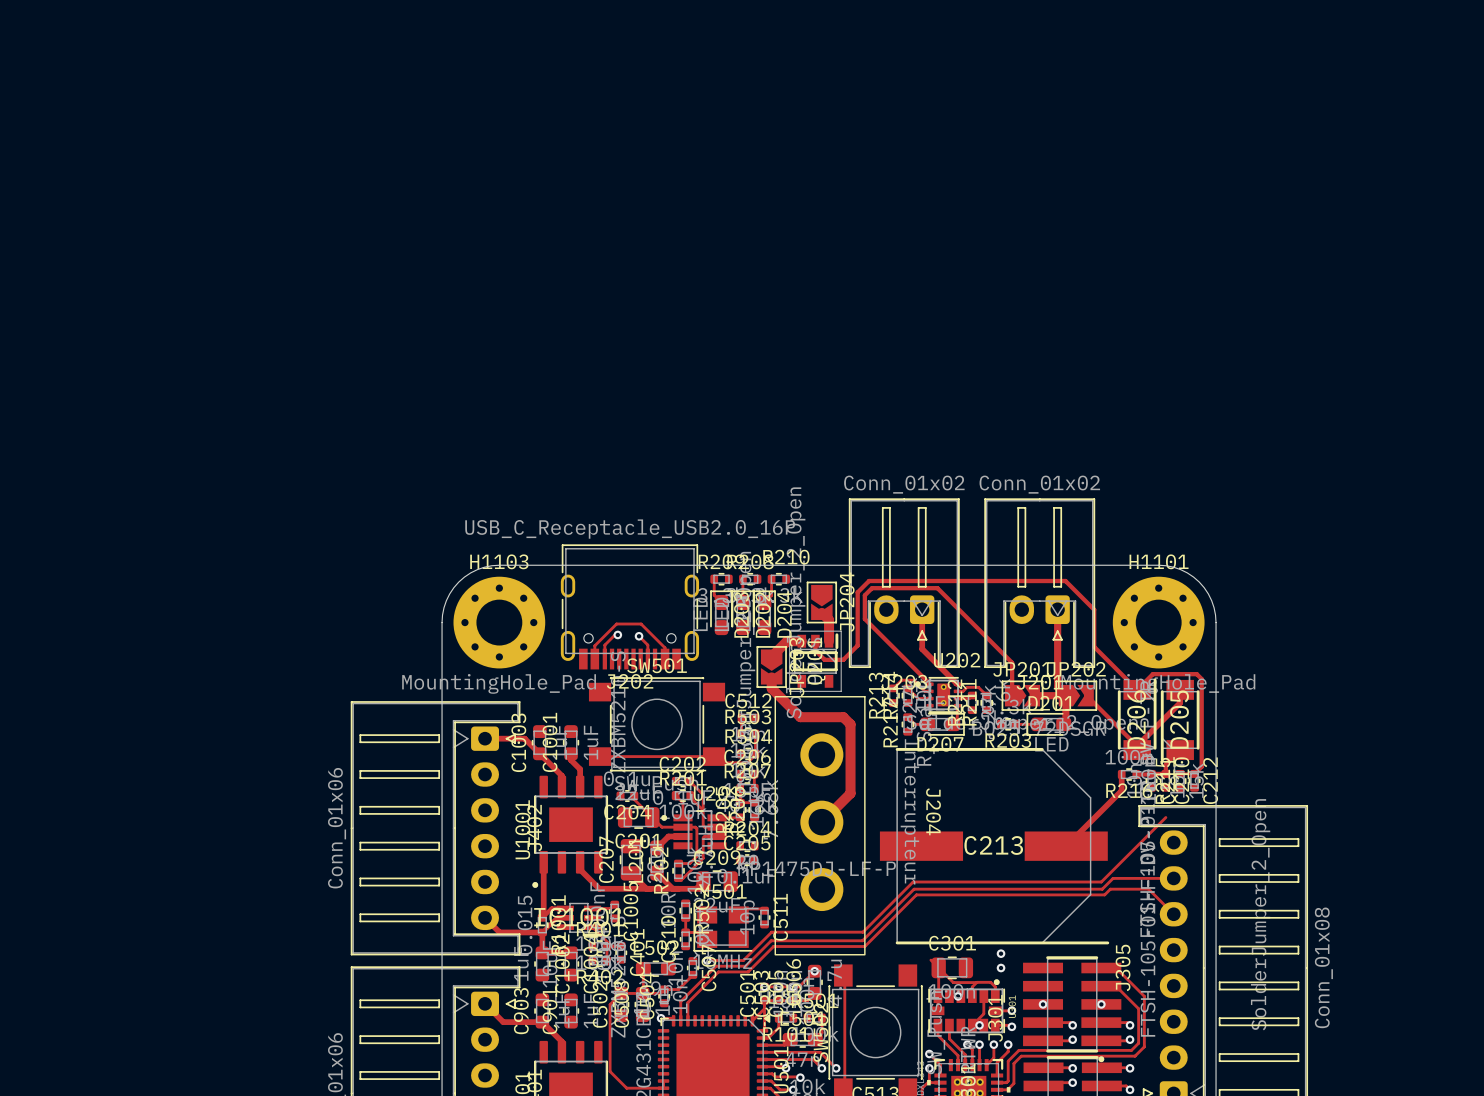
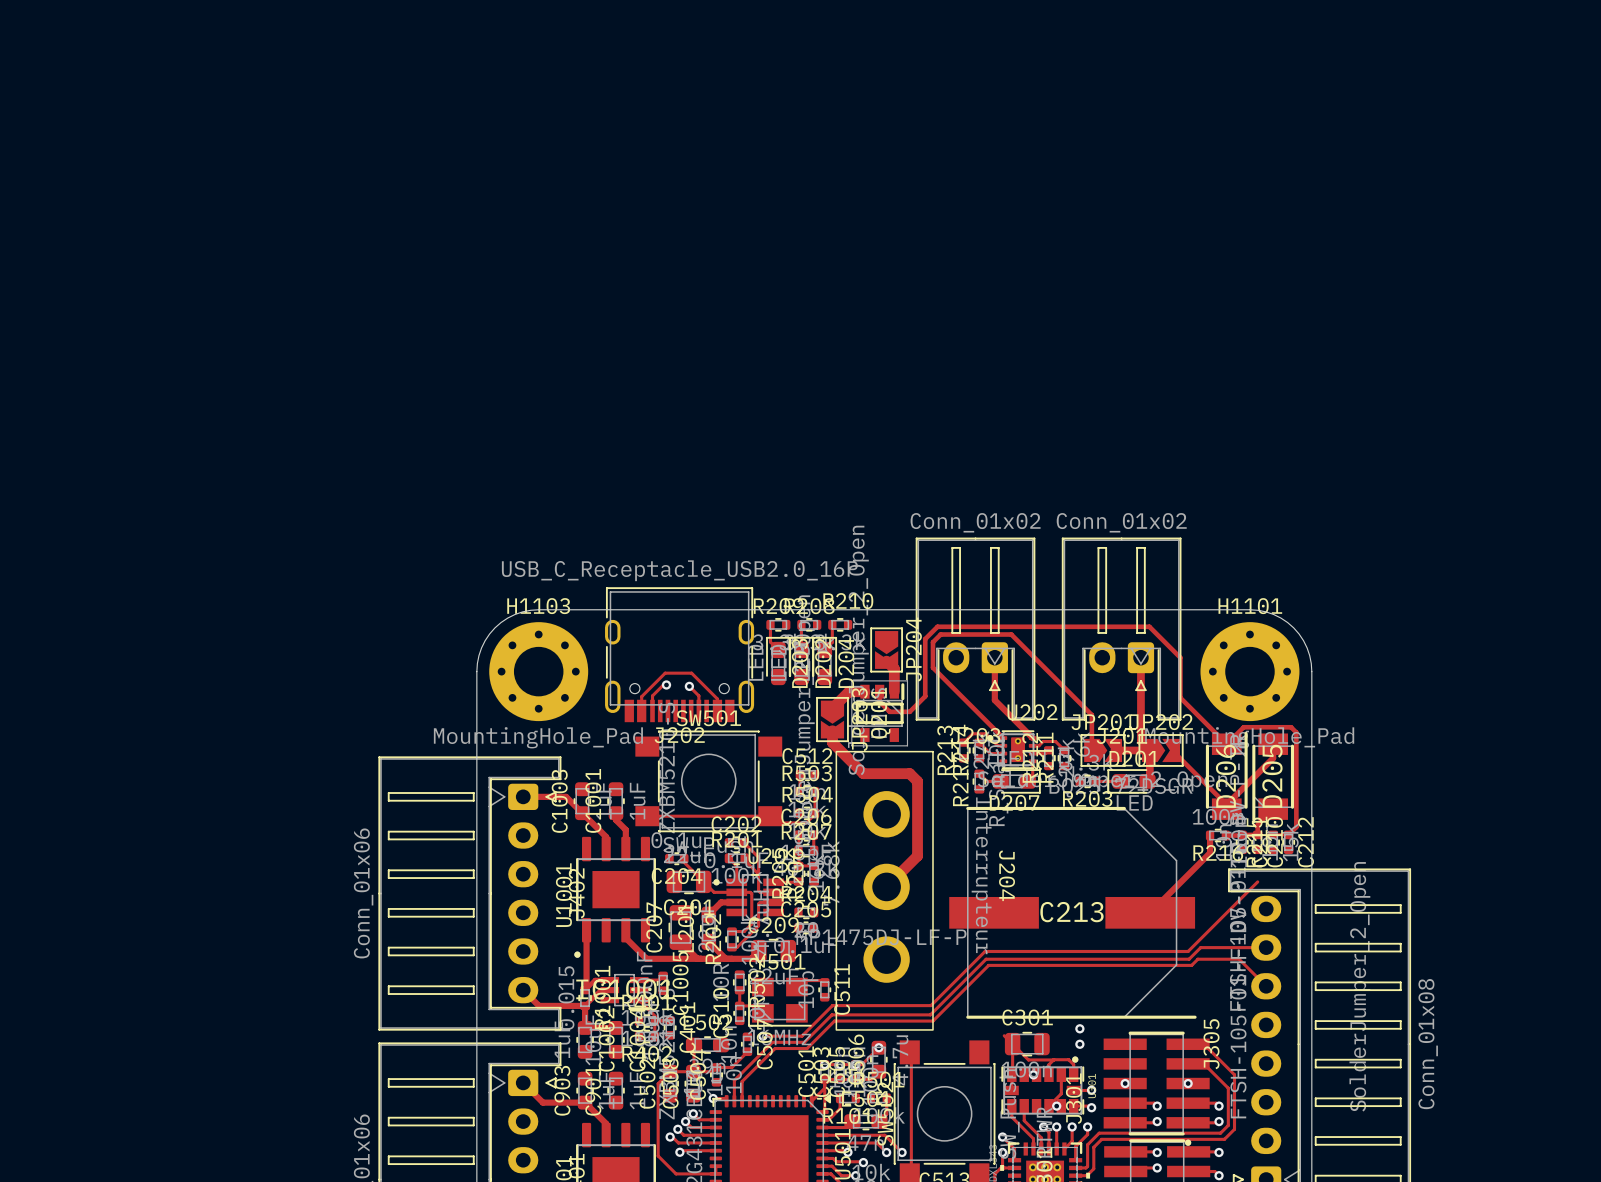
top track: none -> (693, 1113) (699, 1119) (715, 1119)
via: none -> (693, 1113)
top track: none -> (685, 1121) (691, 1127) (715, 1127)
via: none -> (685, 1121)
top track: none -> (677, 1129) (683, 1135) (715, 1135)
via: none -> (677, 1129)
top track: none -> (670, 1137) (678, 1142) (715, 1142)
via: none -> (670, 1137)
top track: none -> (715, 1150) (679, 1152)
via: none -> (679, 1152)

